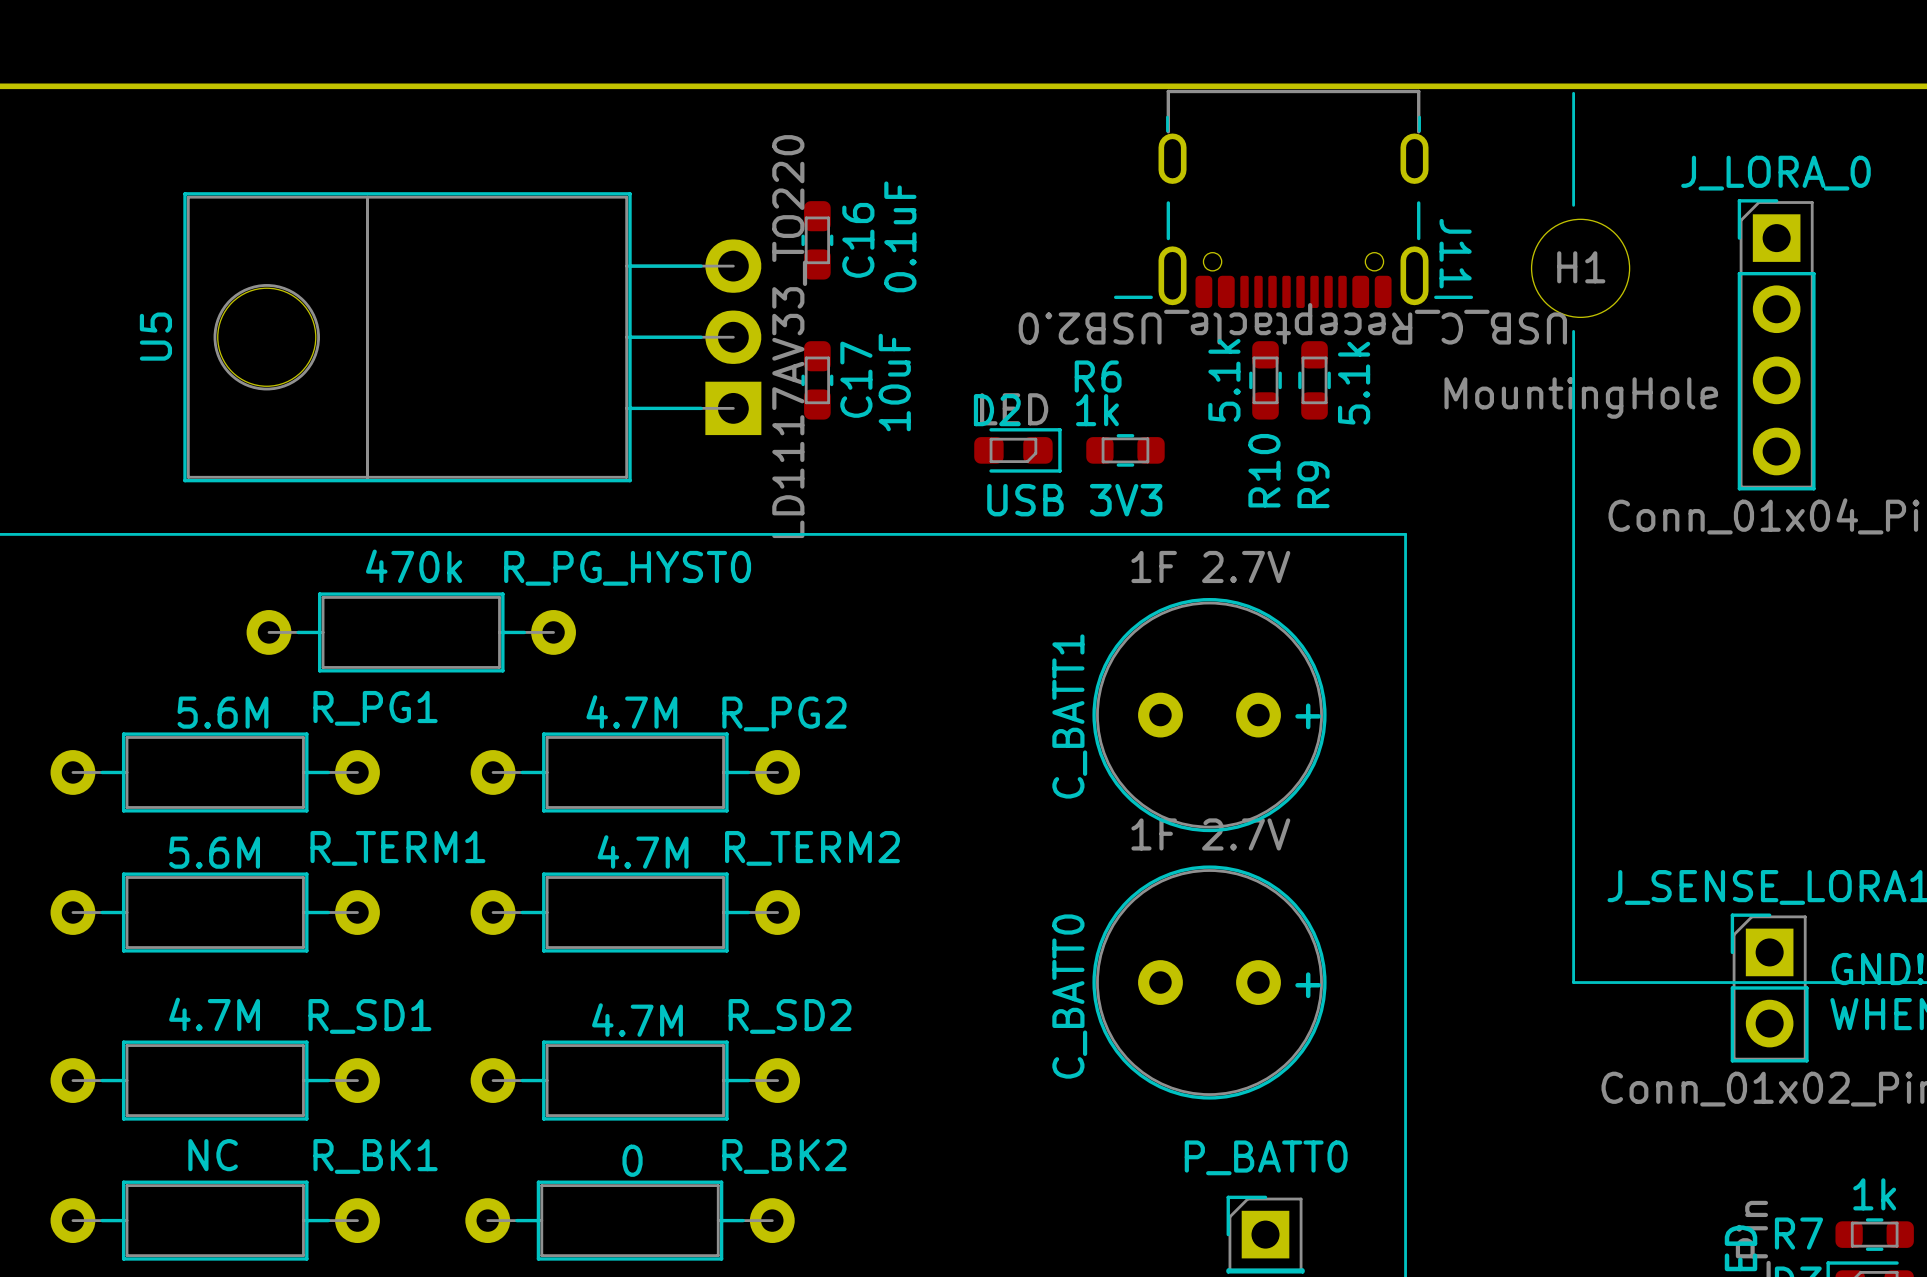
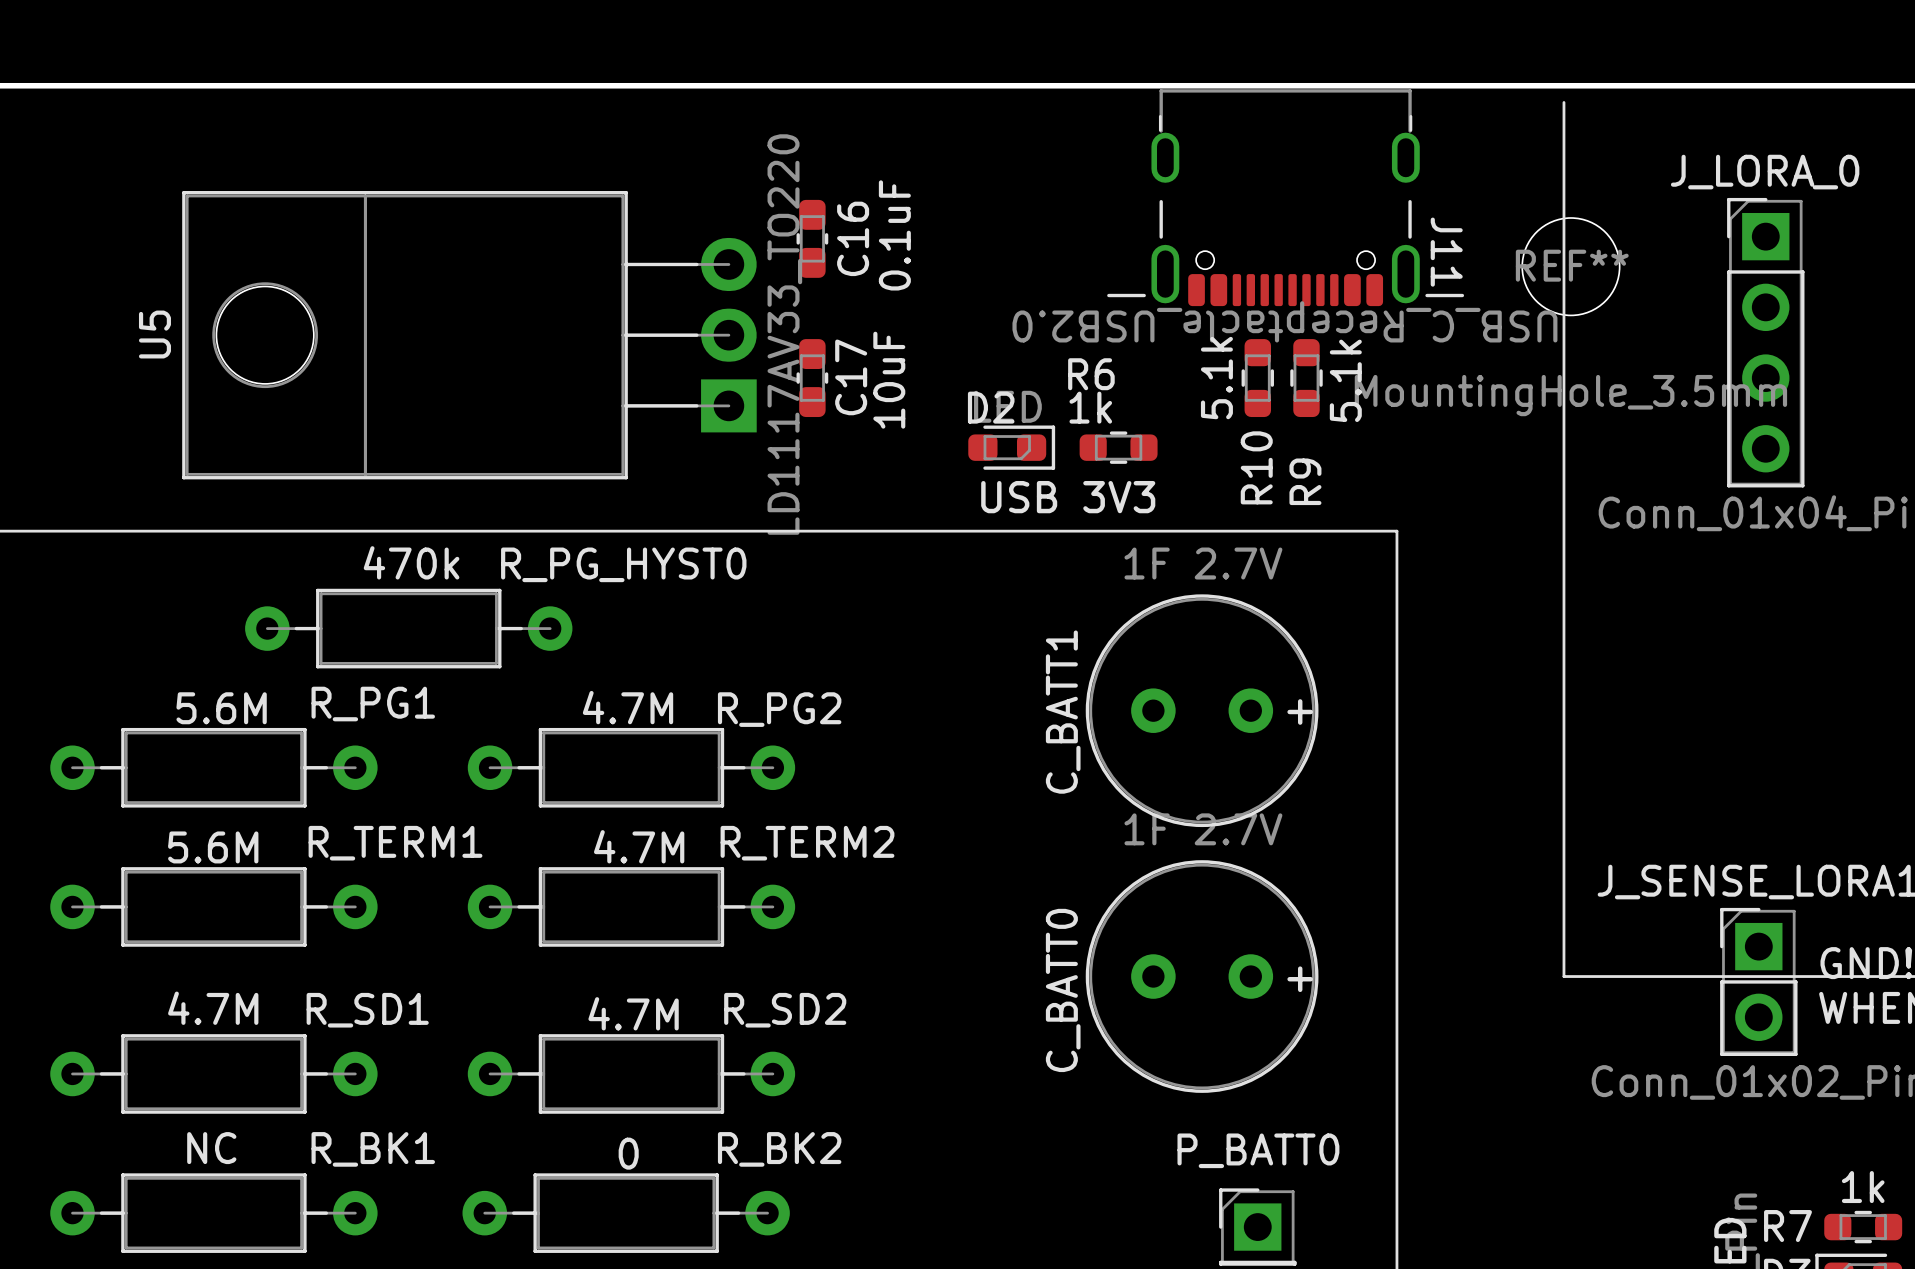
line: (1573, 93) (1573, 103) -> none
line: none -> (1563, 204) (1563, 329)
H1 name: H1 (1581, 267) -> REF** (1572, 265)
H1 value: MountingHole (1581, 398) -> MountingHole_3.5mm (1570, 395)

